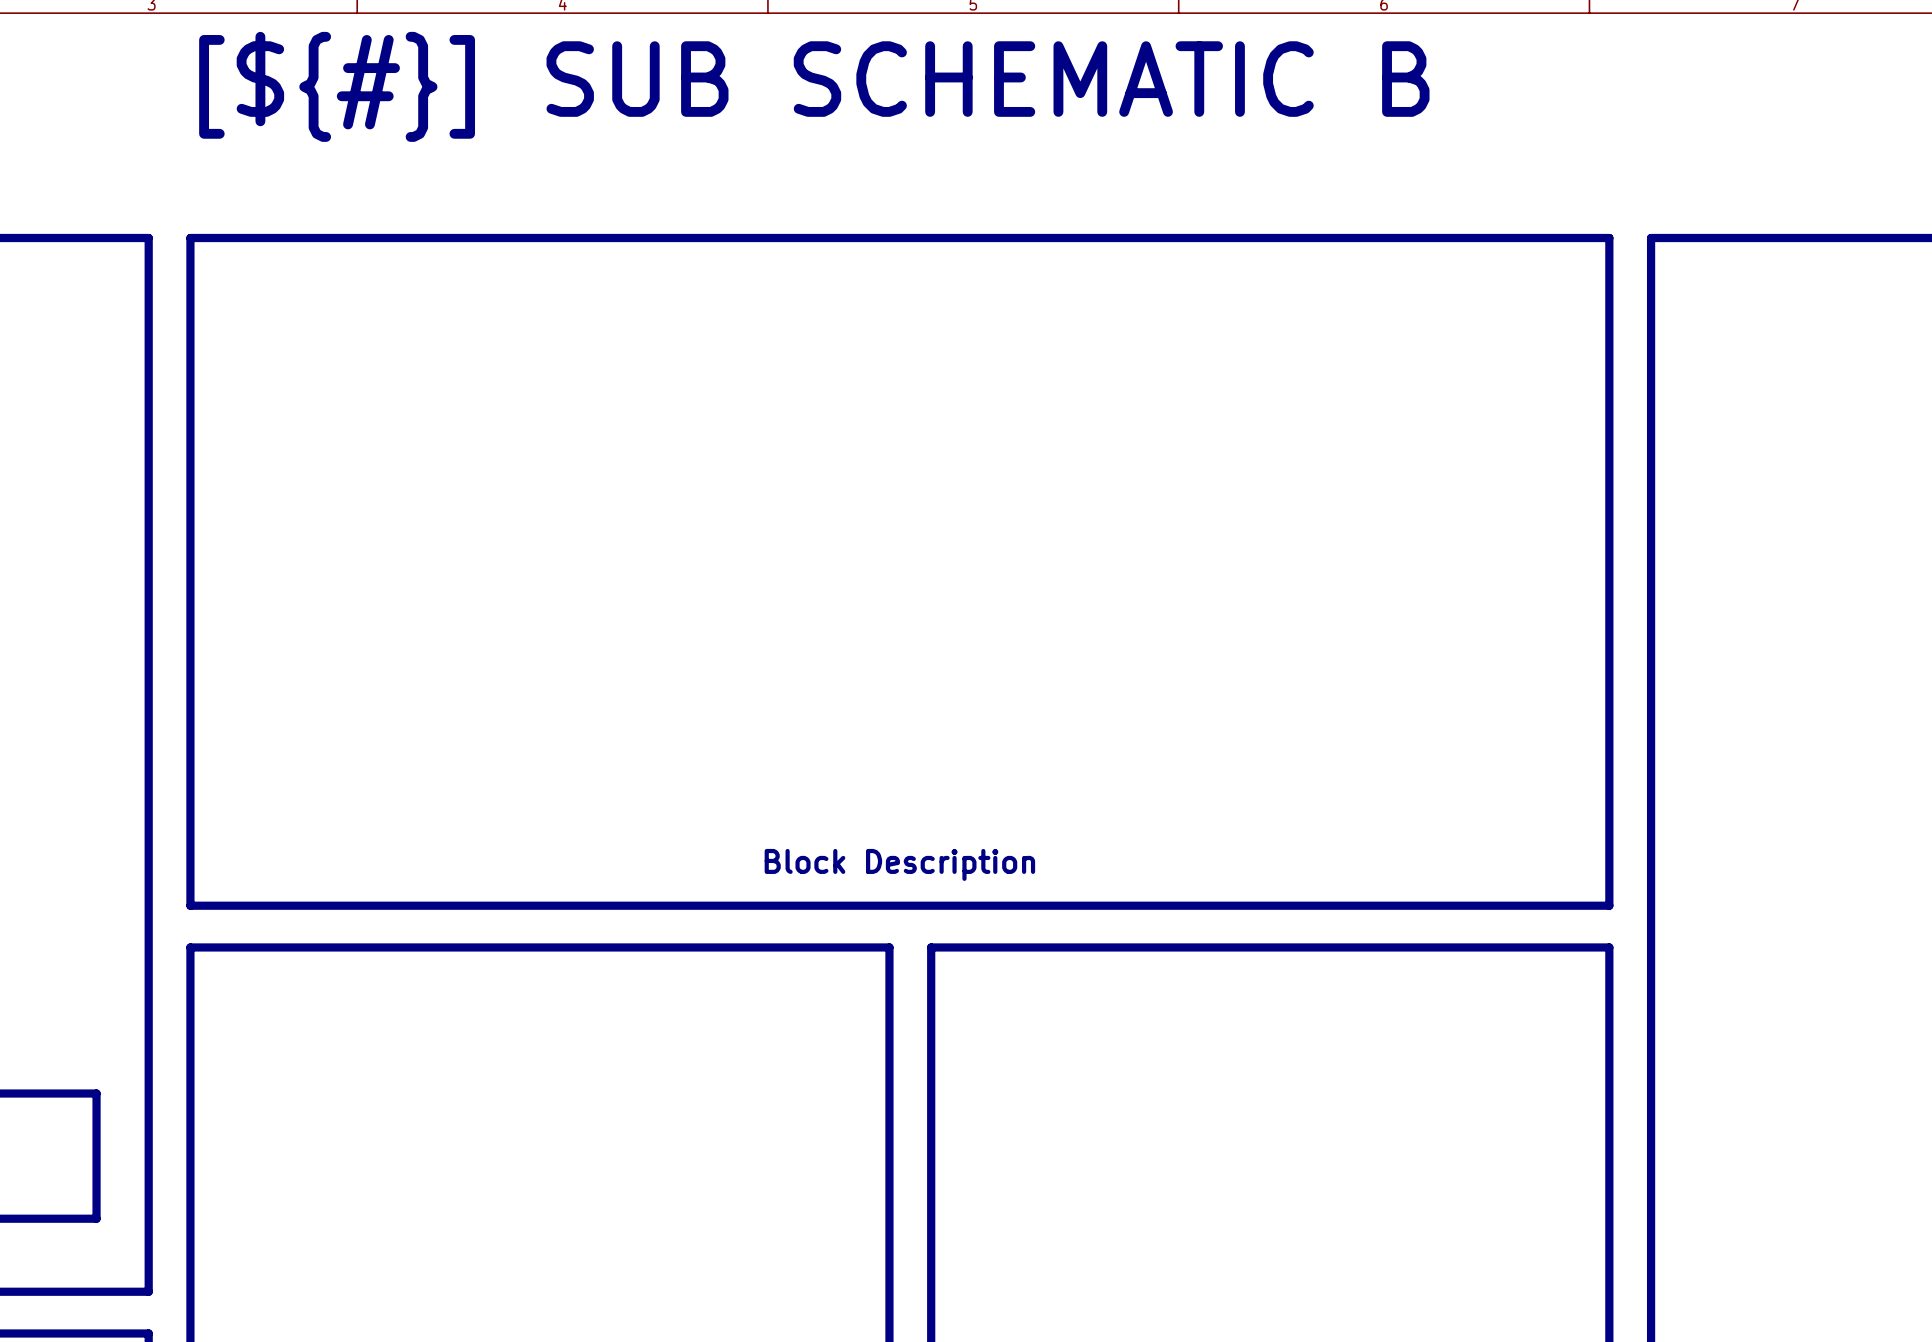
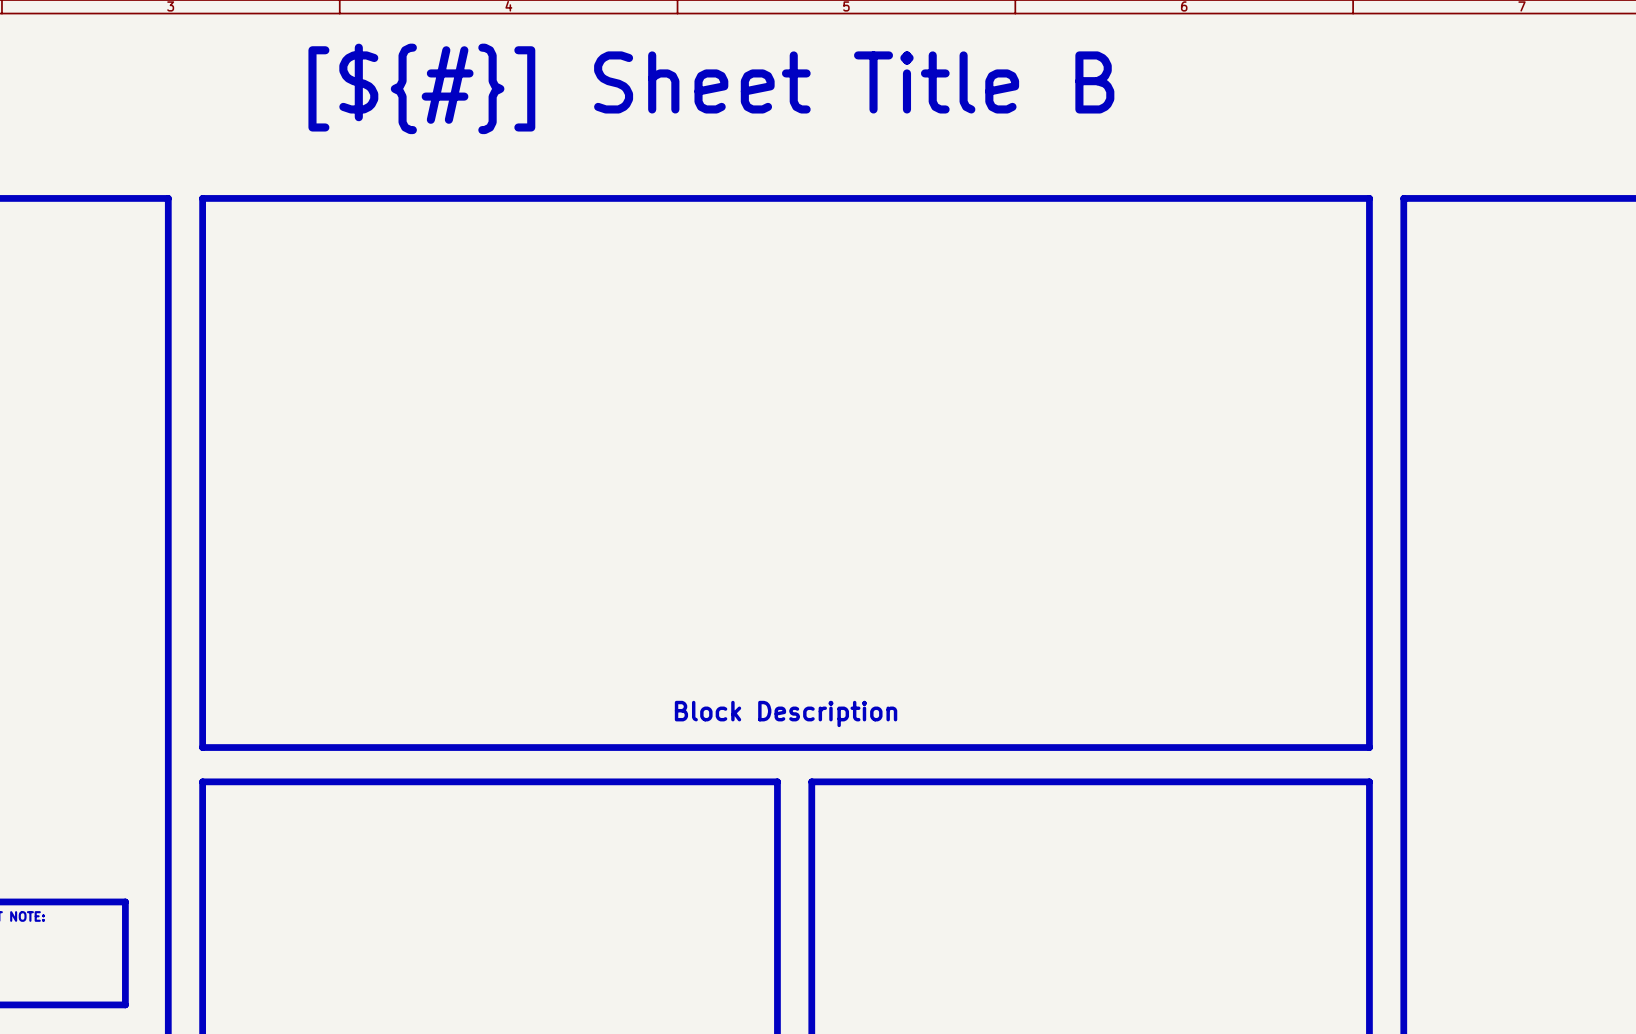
text: [${#}] SUB SCHEMATIC B (814, 86) -> none
text: none -> [${#}] Sheet Title B (711, 88)

